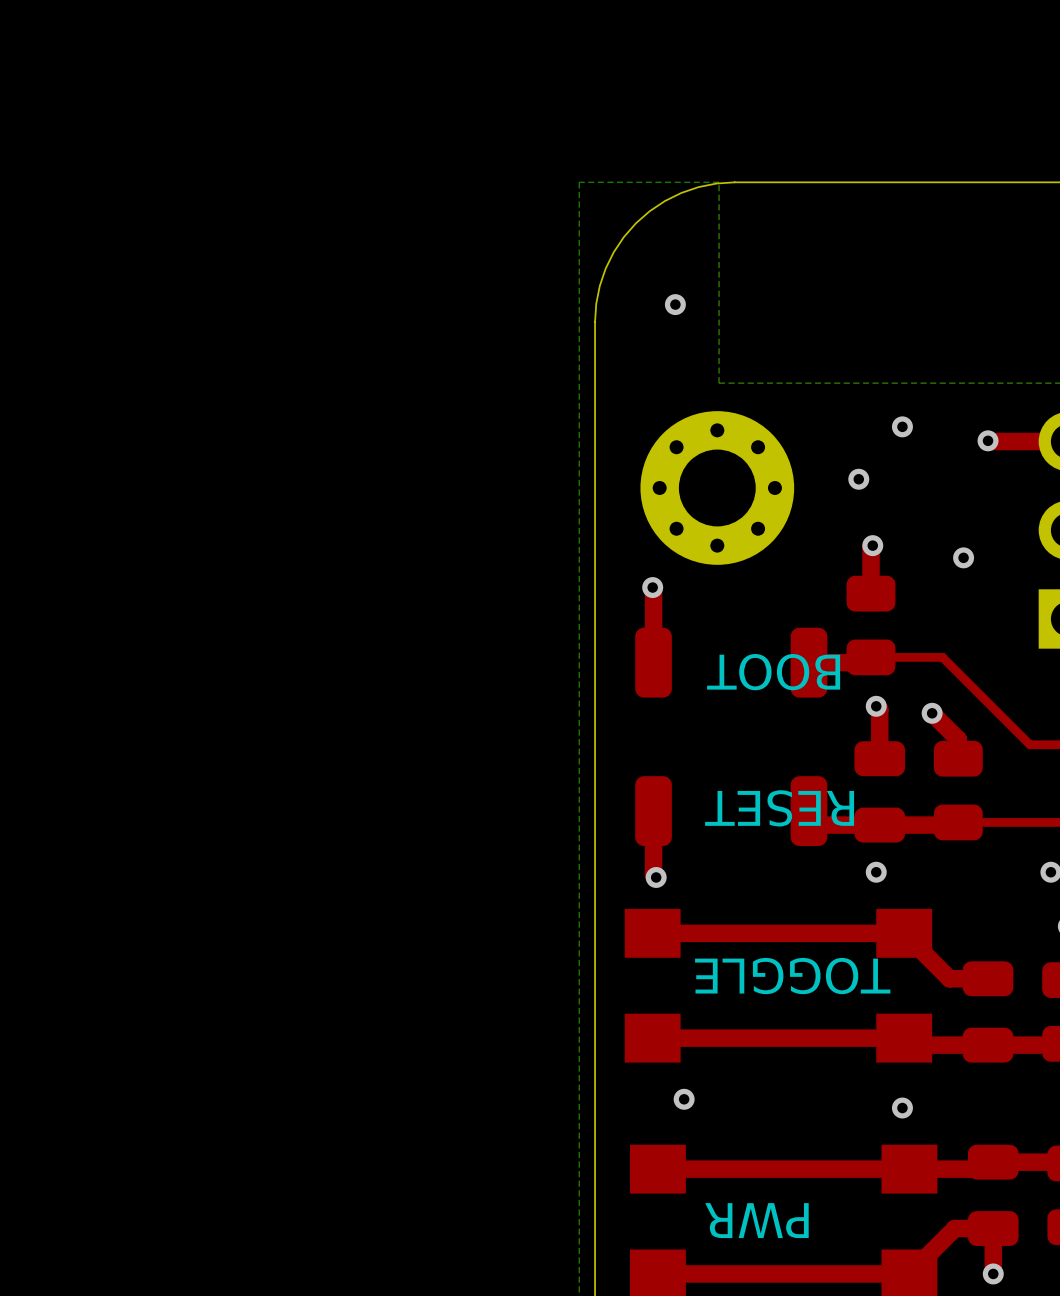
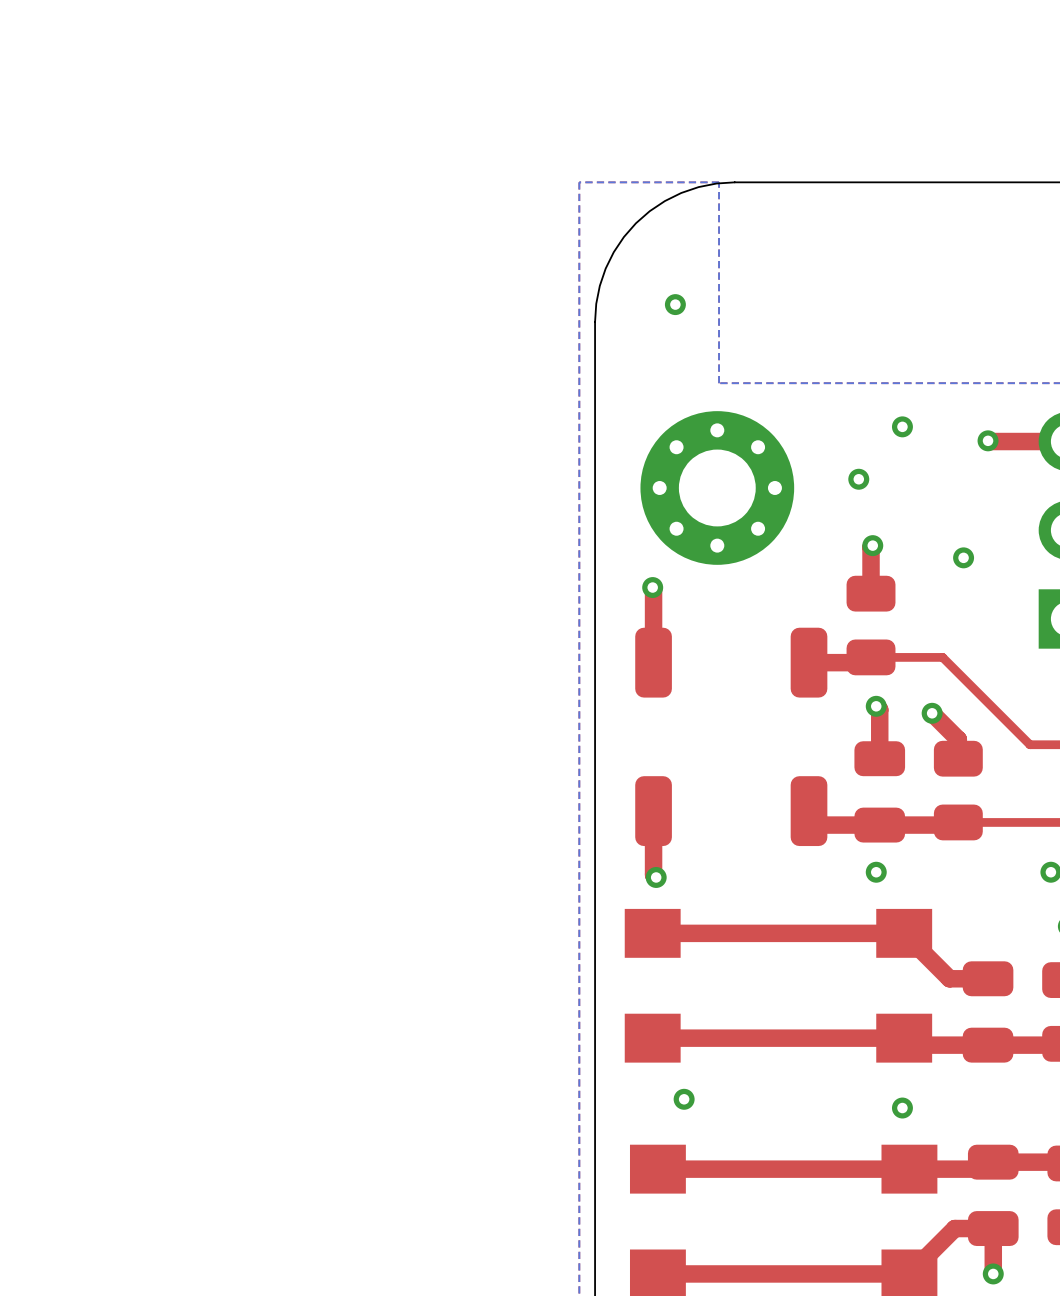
text: BOOT (773, 672) -> none
text: RESET (779, 808) -> none
text: TOGGLE (792, 976) -> none
text: PWR (756, 1220) -> none

